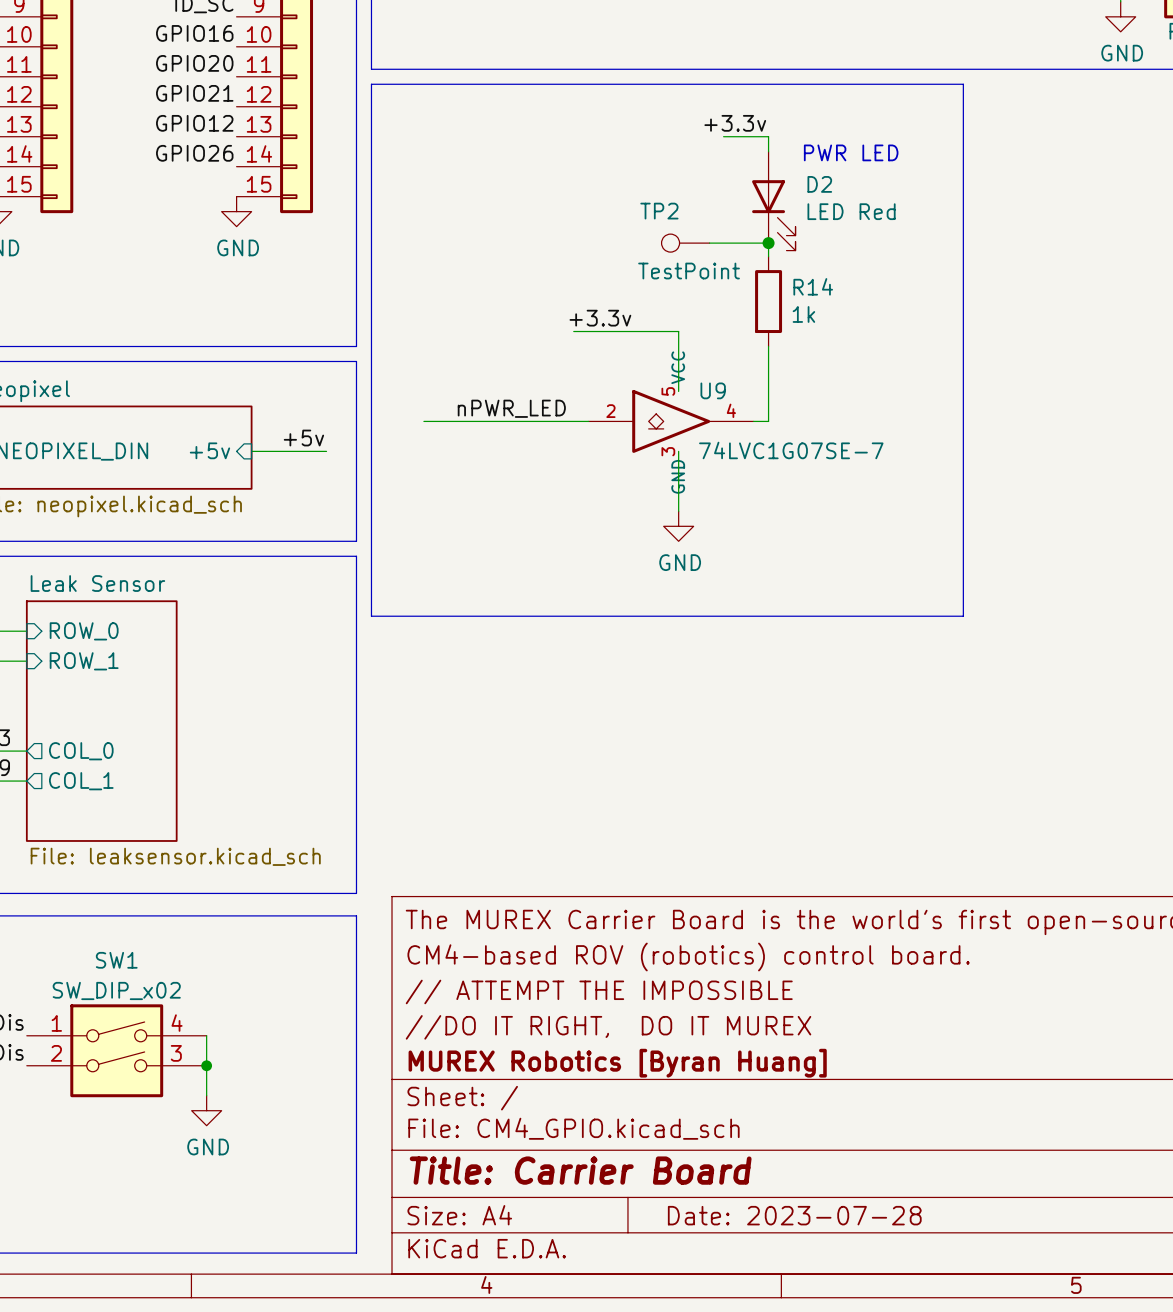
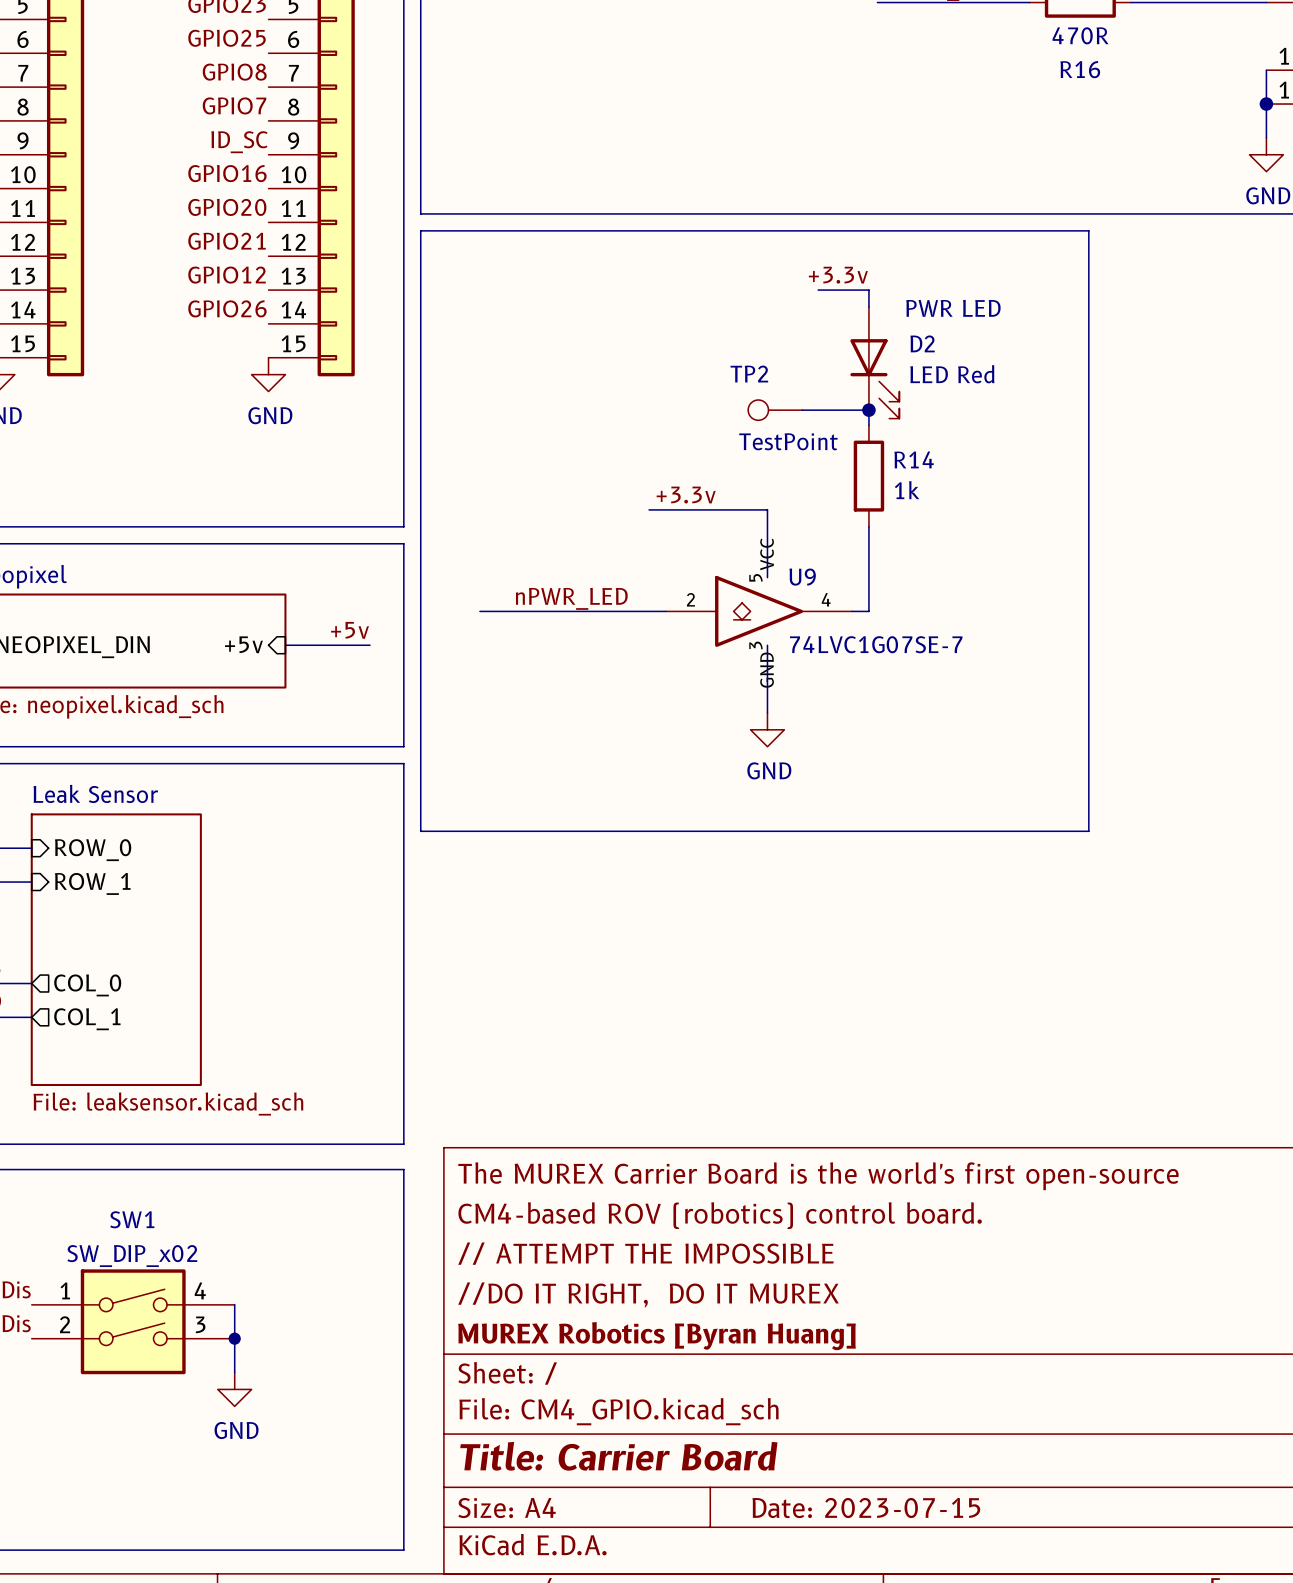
title block: Date: 2023-07-28 (794, 1215) -> Date: 2023-07-15 (866, 1507)

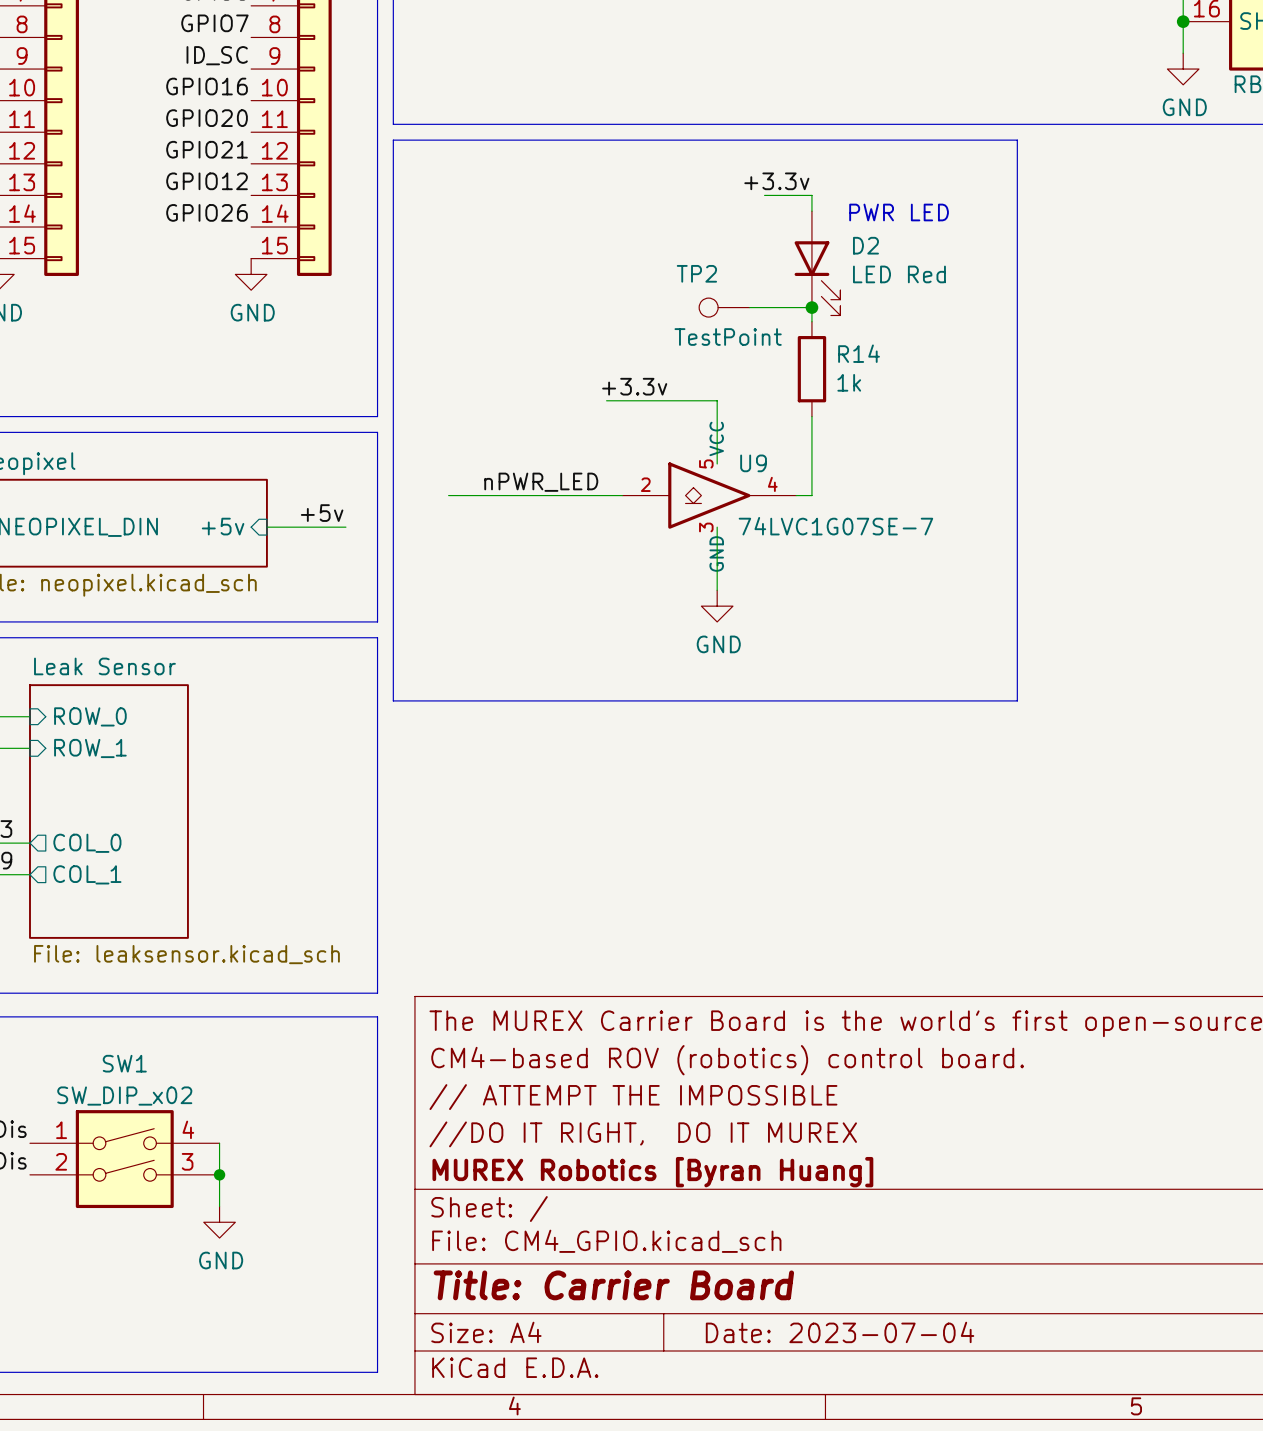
title block: Date: 2023-07-15 (866, 1507) -> Date: 2023-07-04 (840, 1332)

